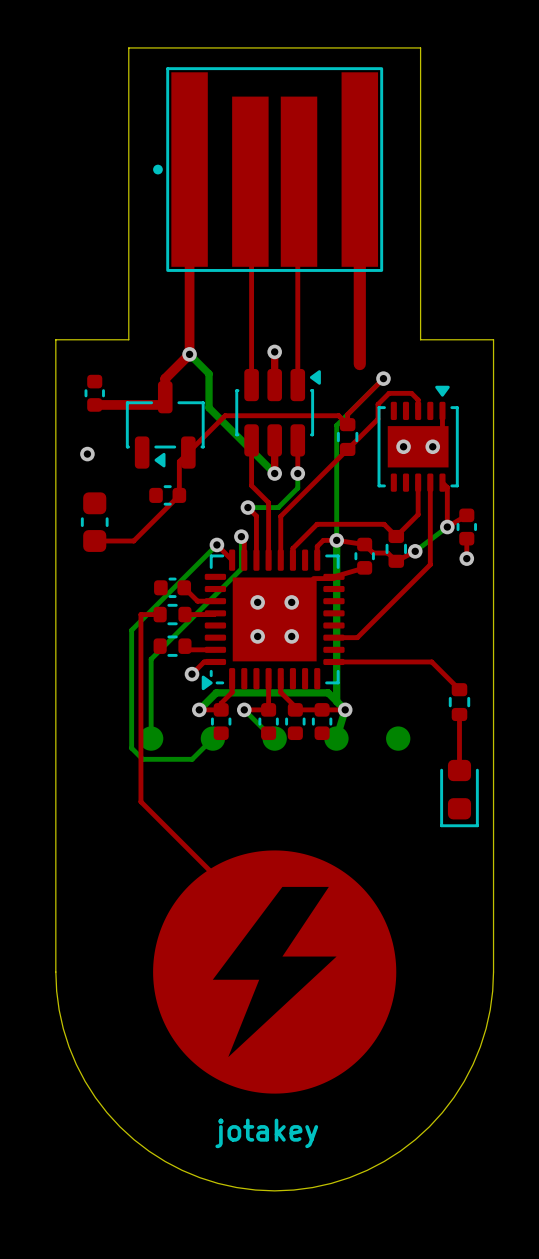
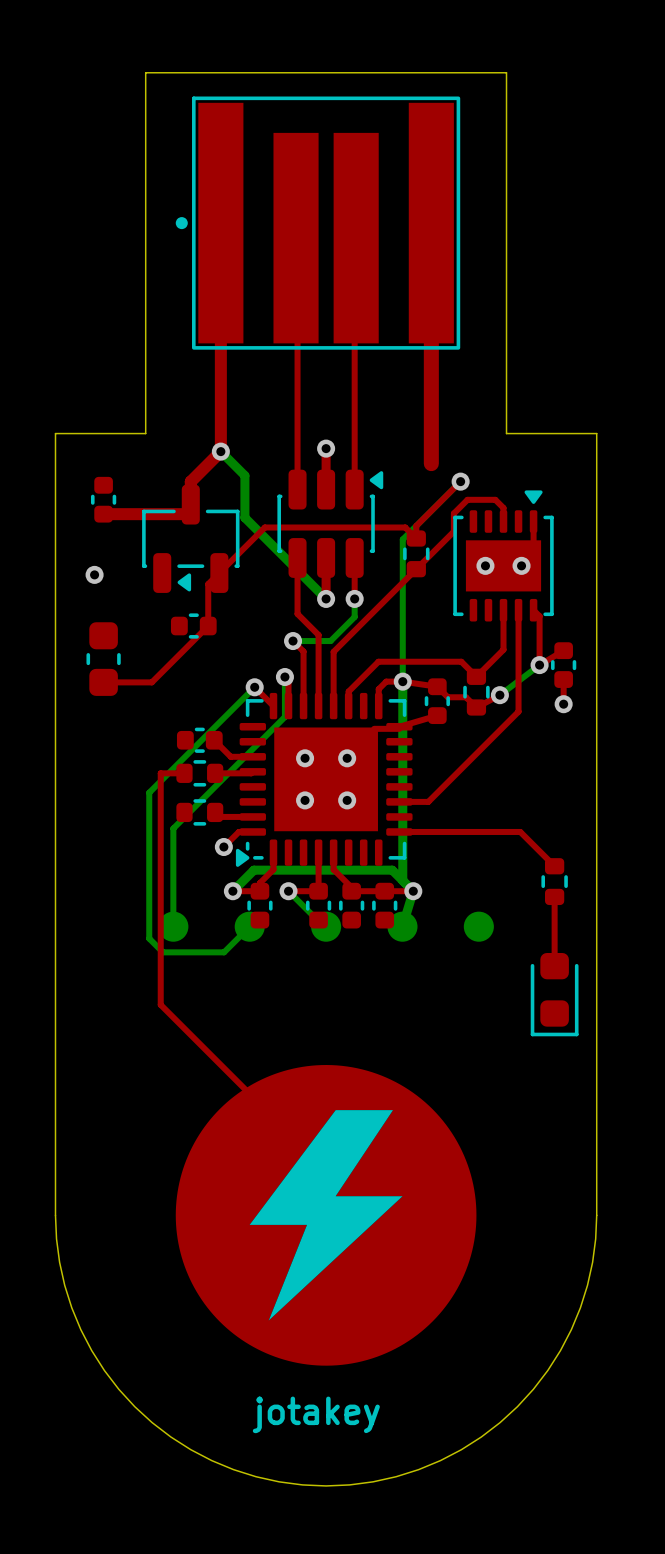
part footprint: [153, 850, 397, 1094] -> [175, 1065, 477, 1366]

